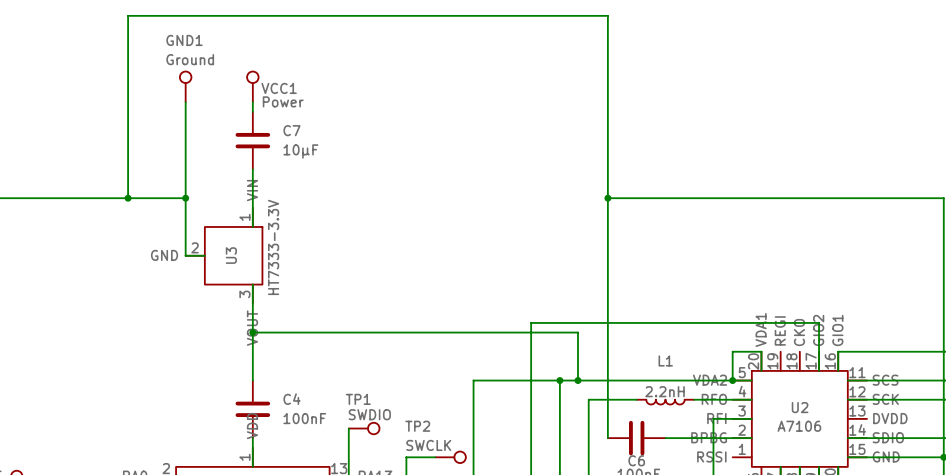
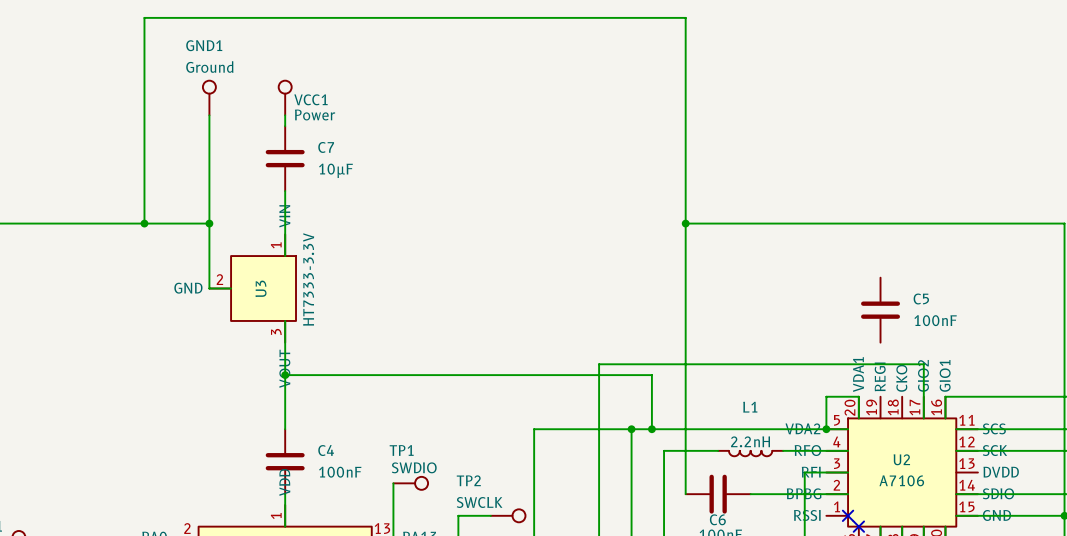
C5: none -> 100nF (880, 310)
no-connect mark: none -> (848, 515)
no-connect mark: none -> (858, 526)

